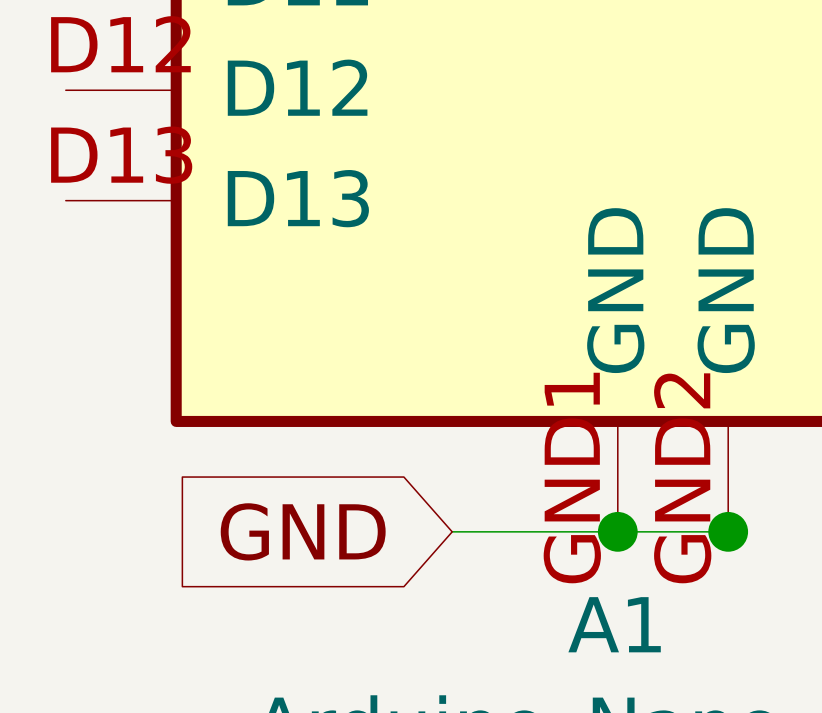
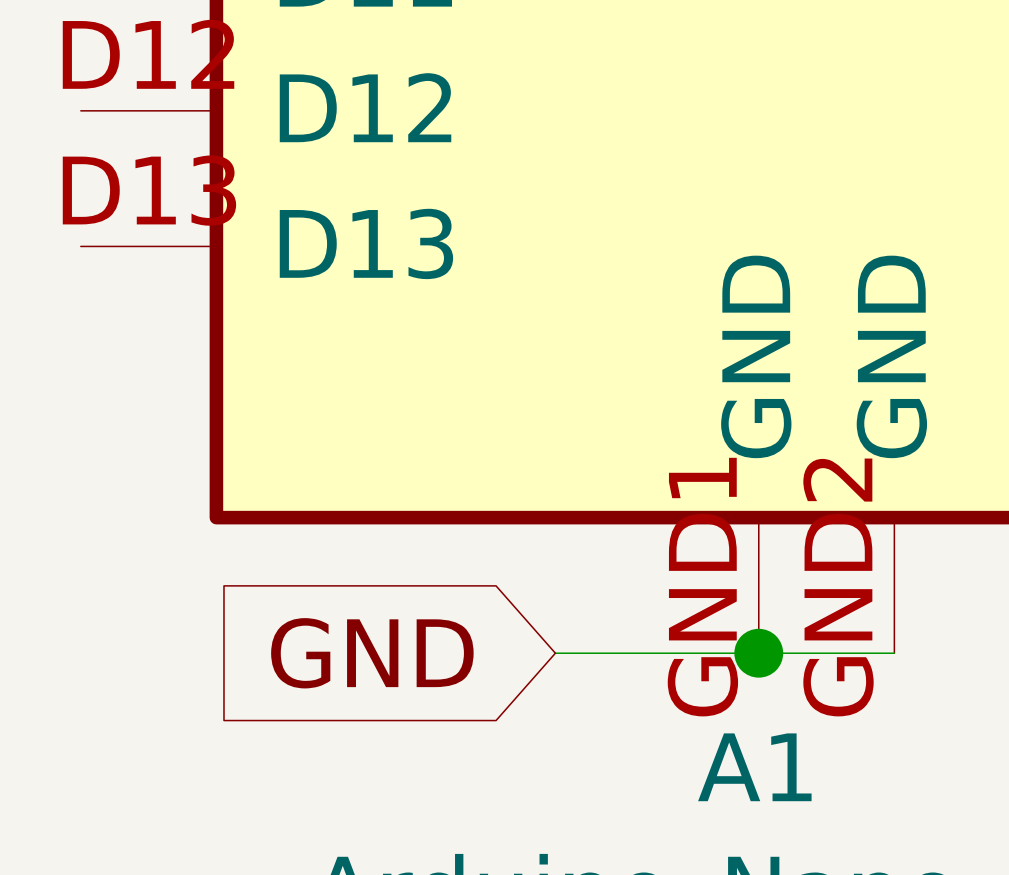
junction: (728, 531) -> none

